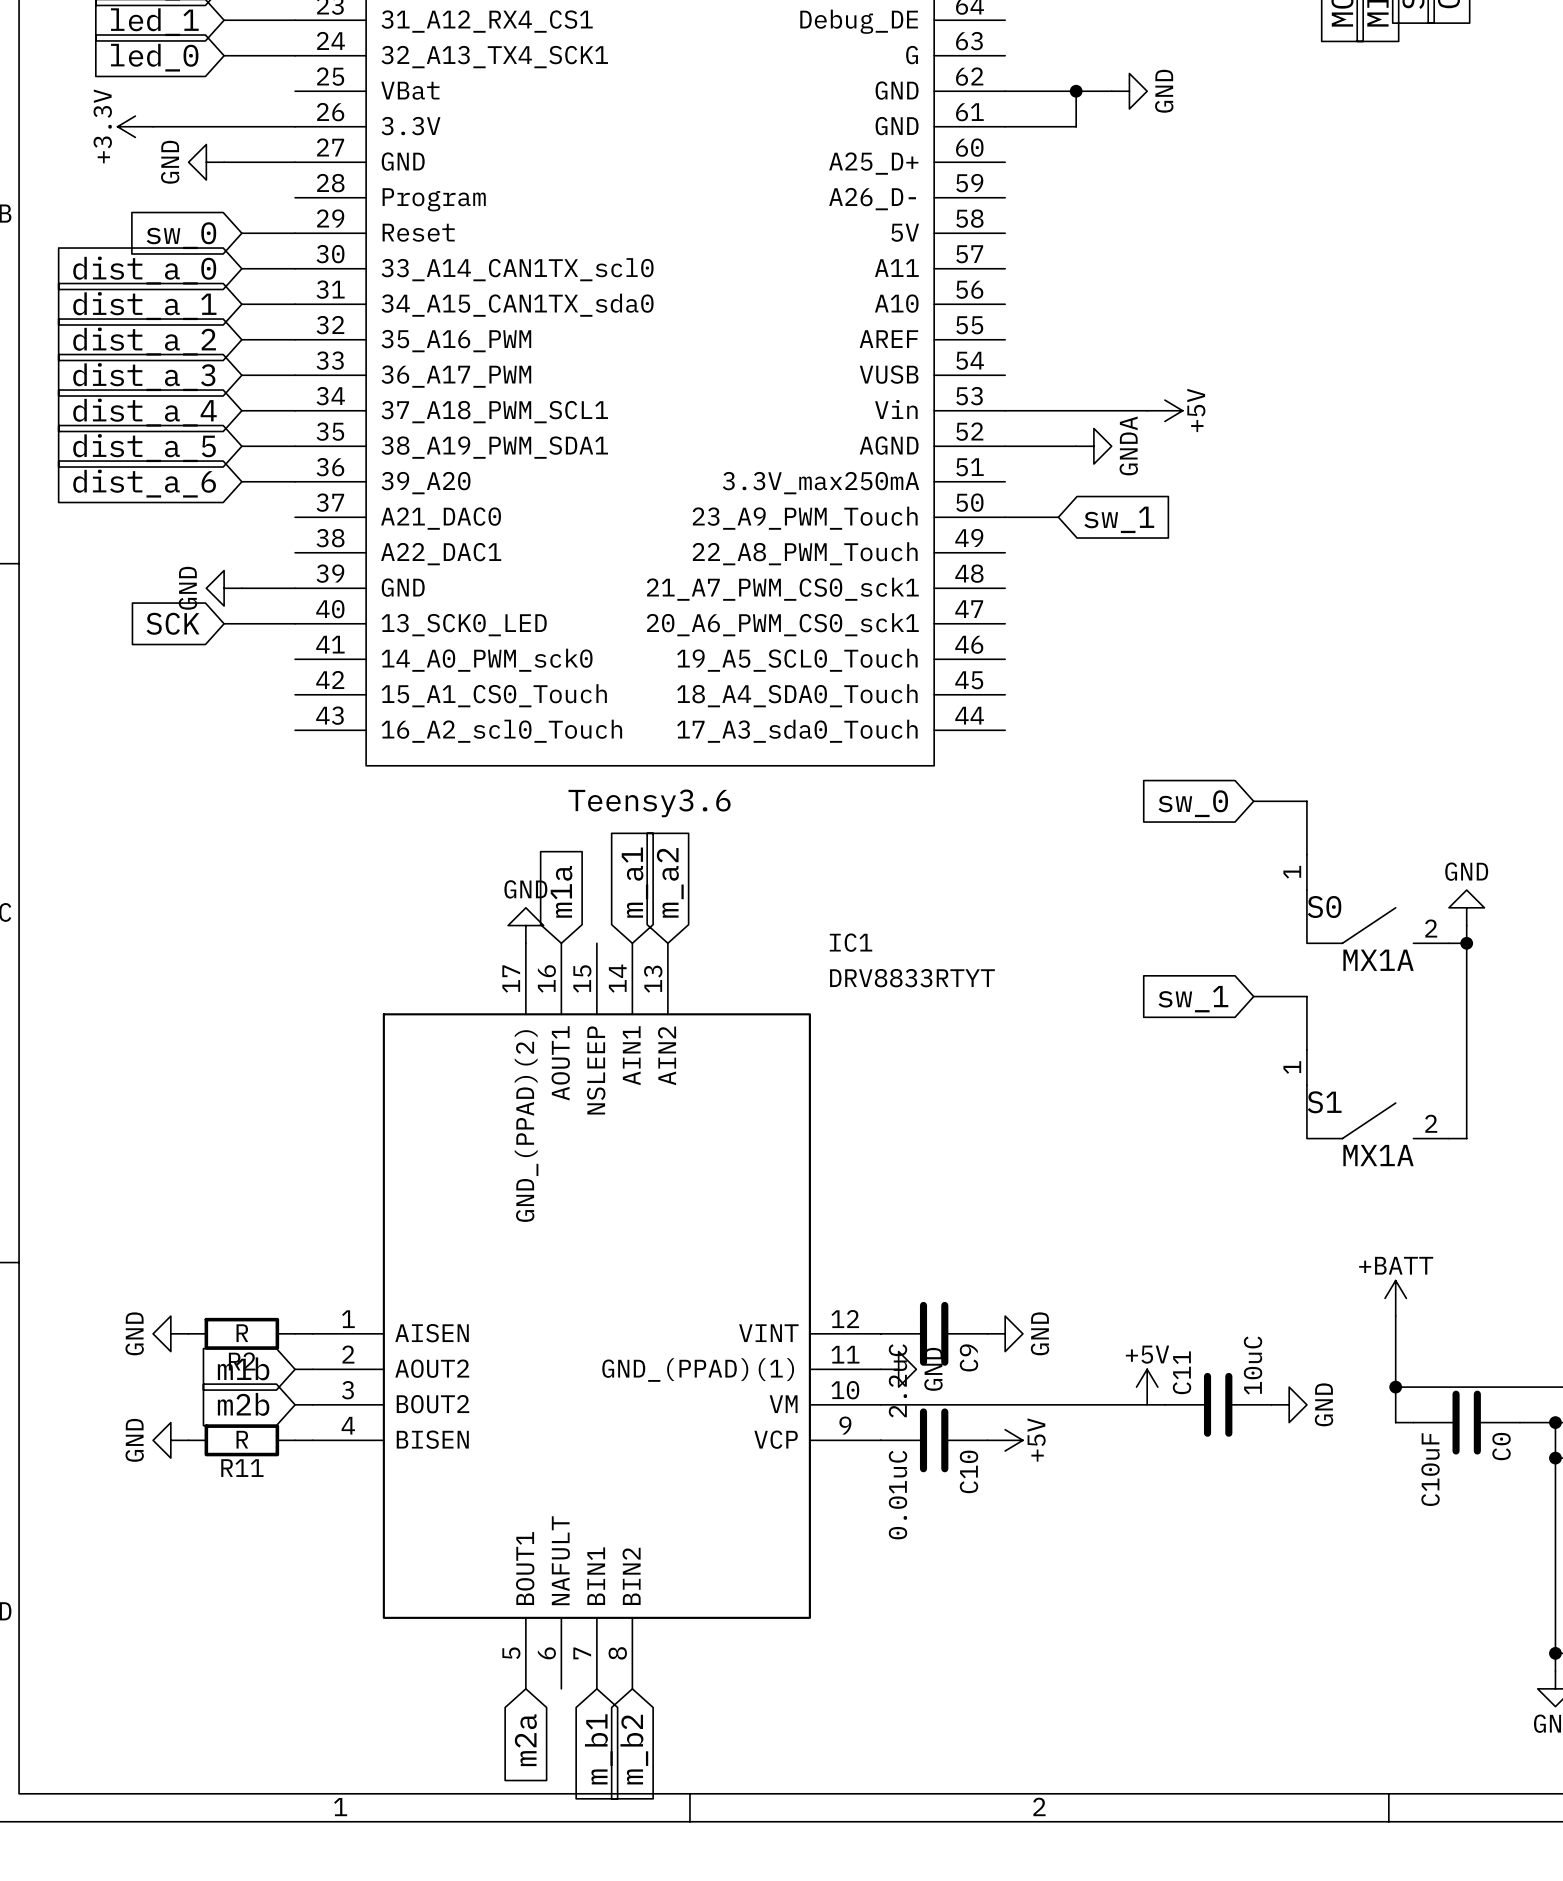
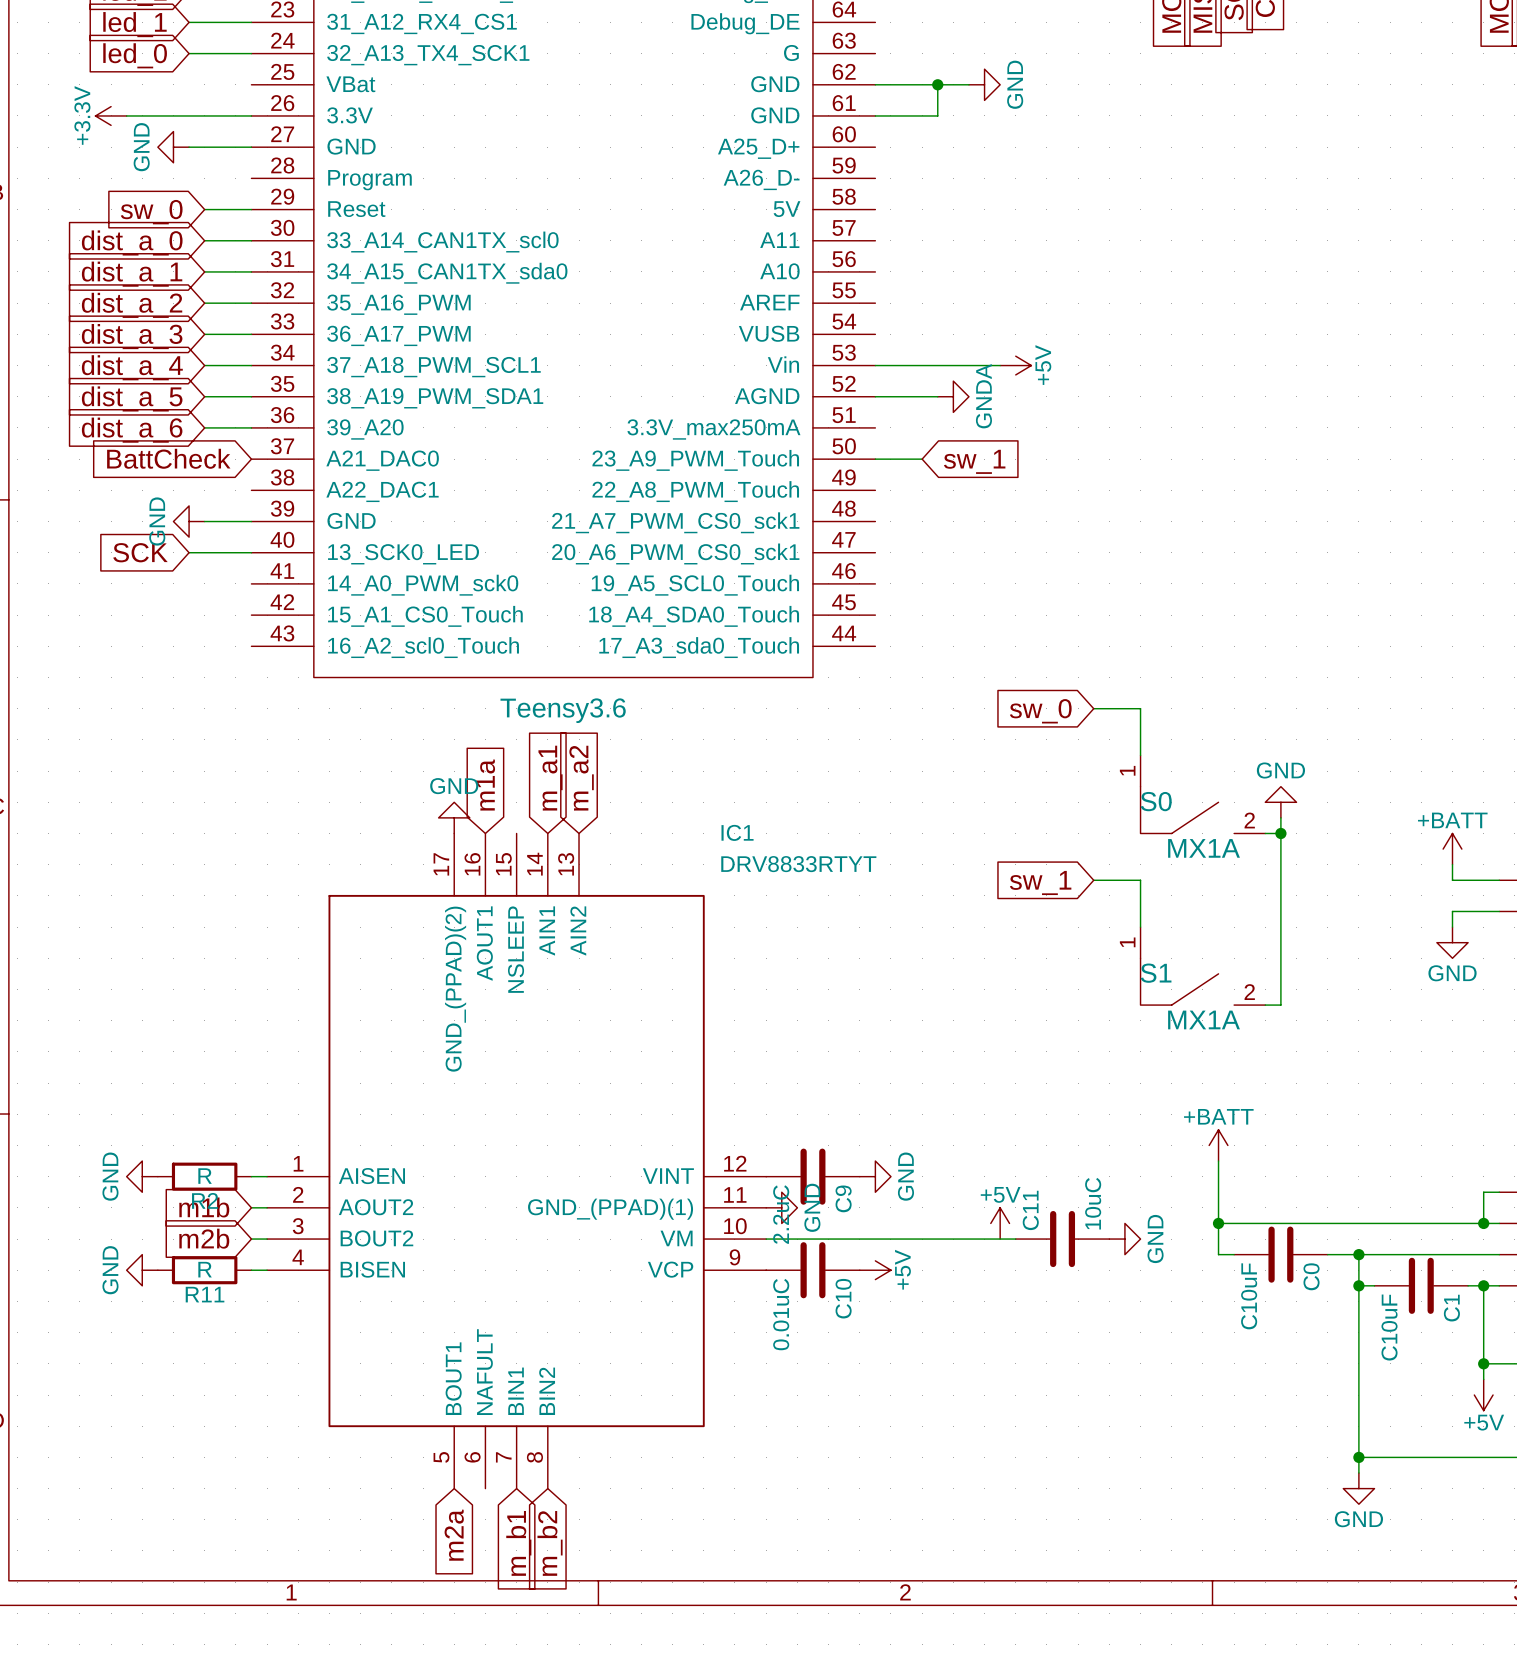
global label: none -> BattCheck (168, 458)

